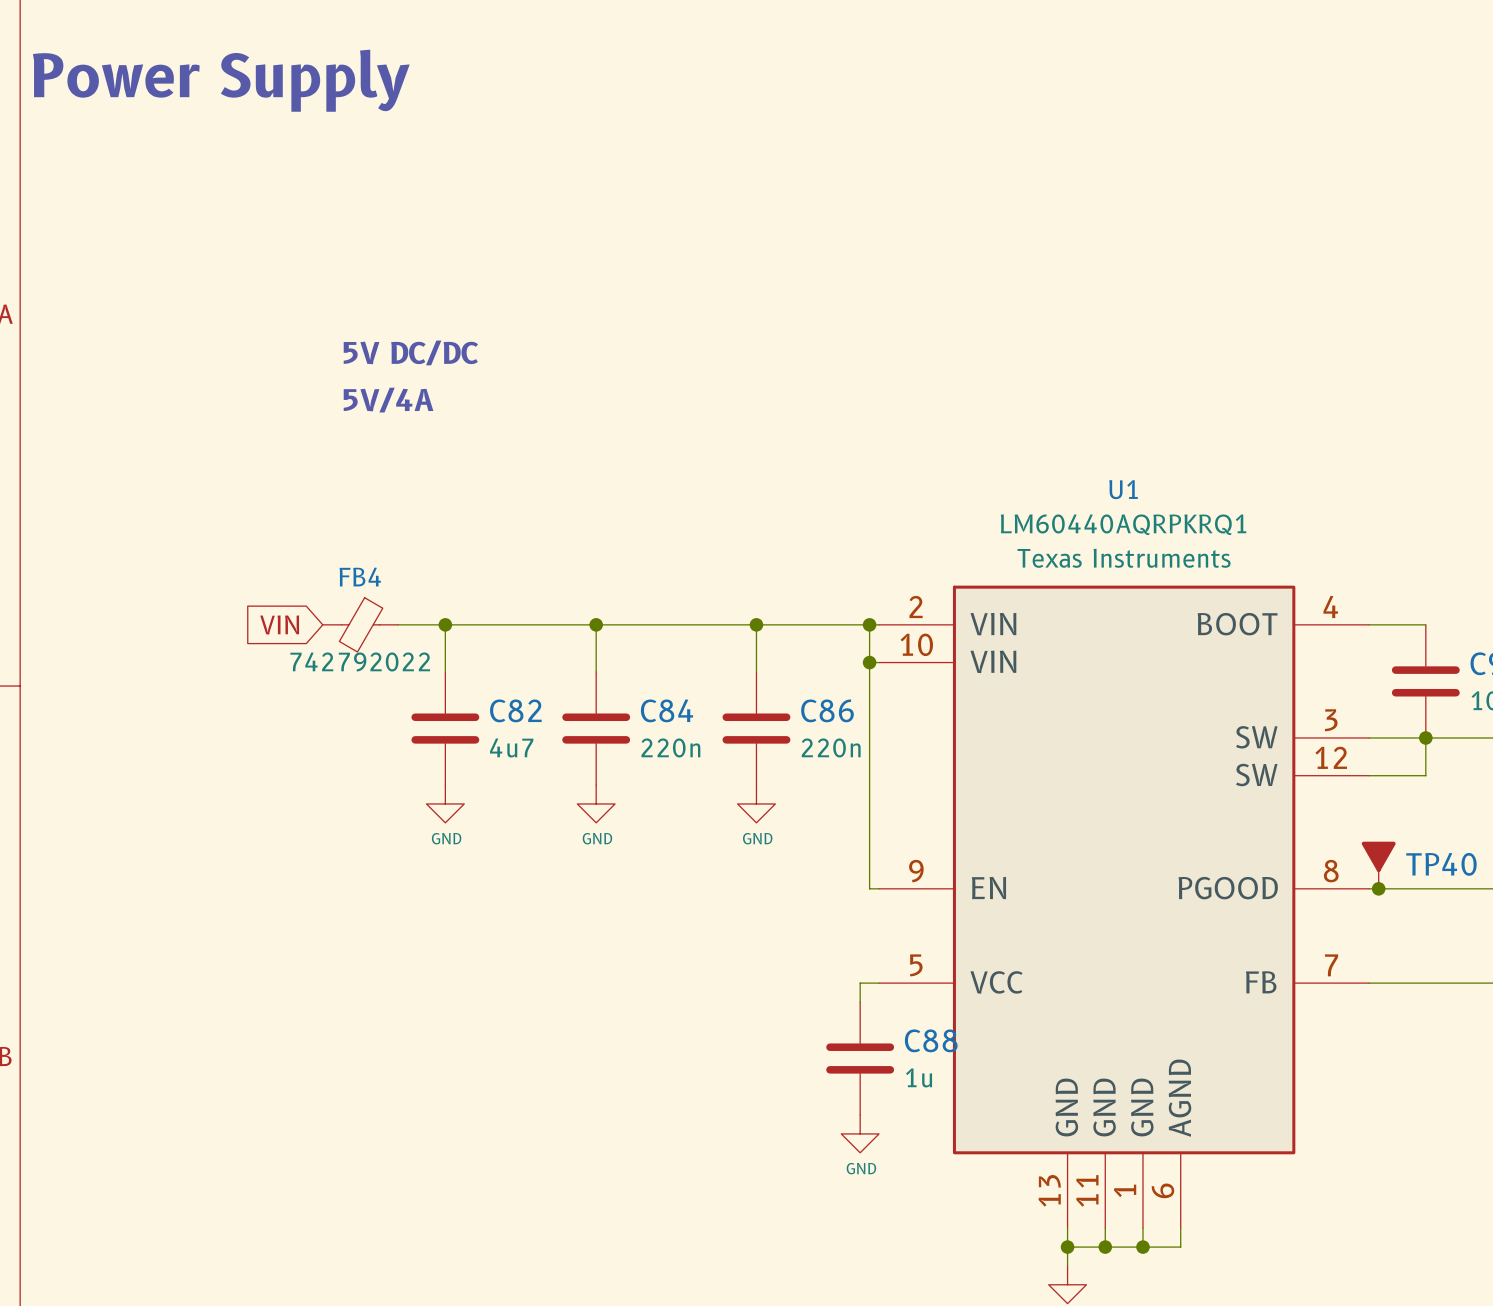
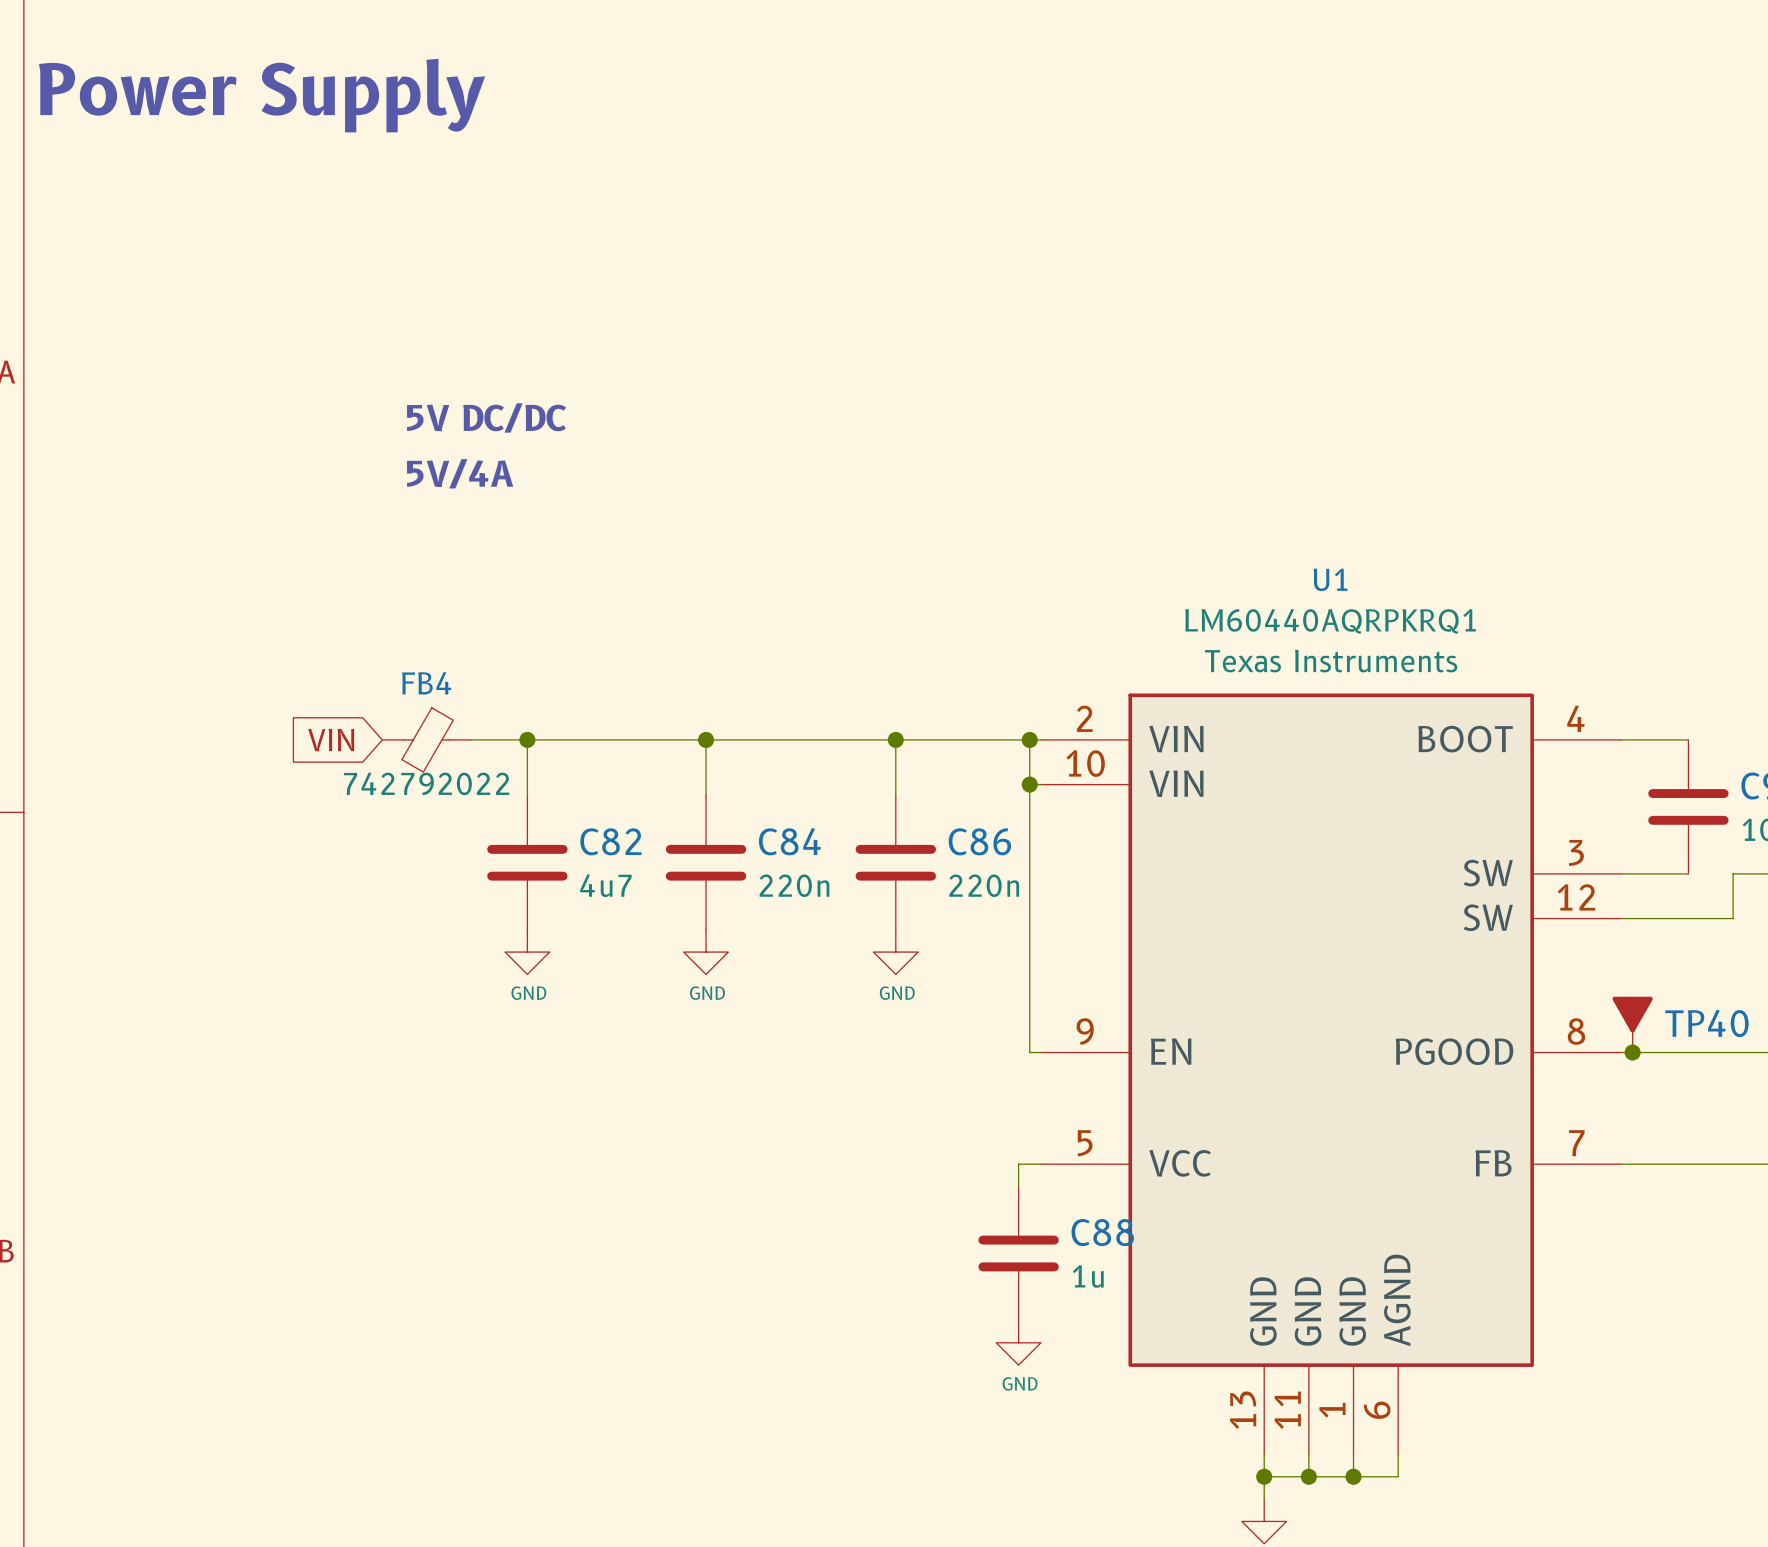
junction: (1425, 737) -> none
wire: (1463, 737) (1425, 737) (1425, 775) -> (1733, 873) (1733, 918) (1688, 918)

